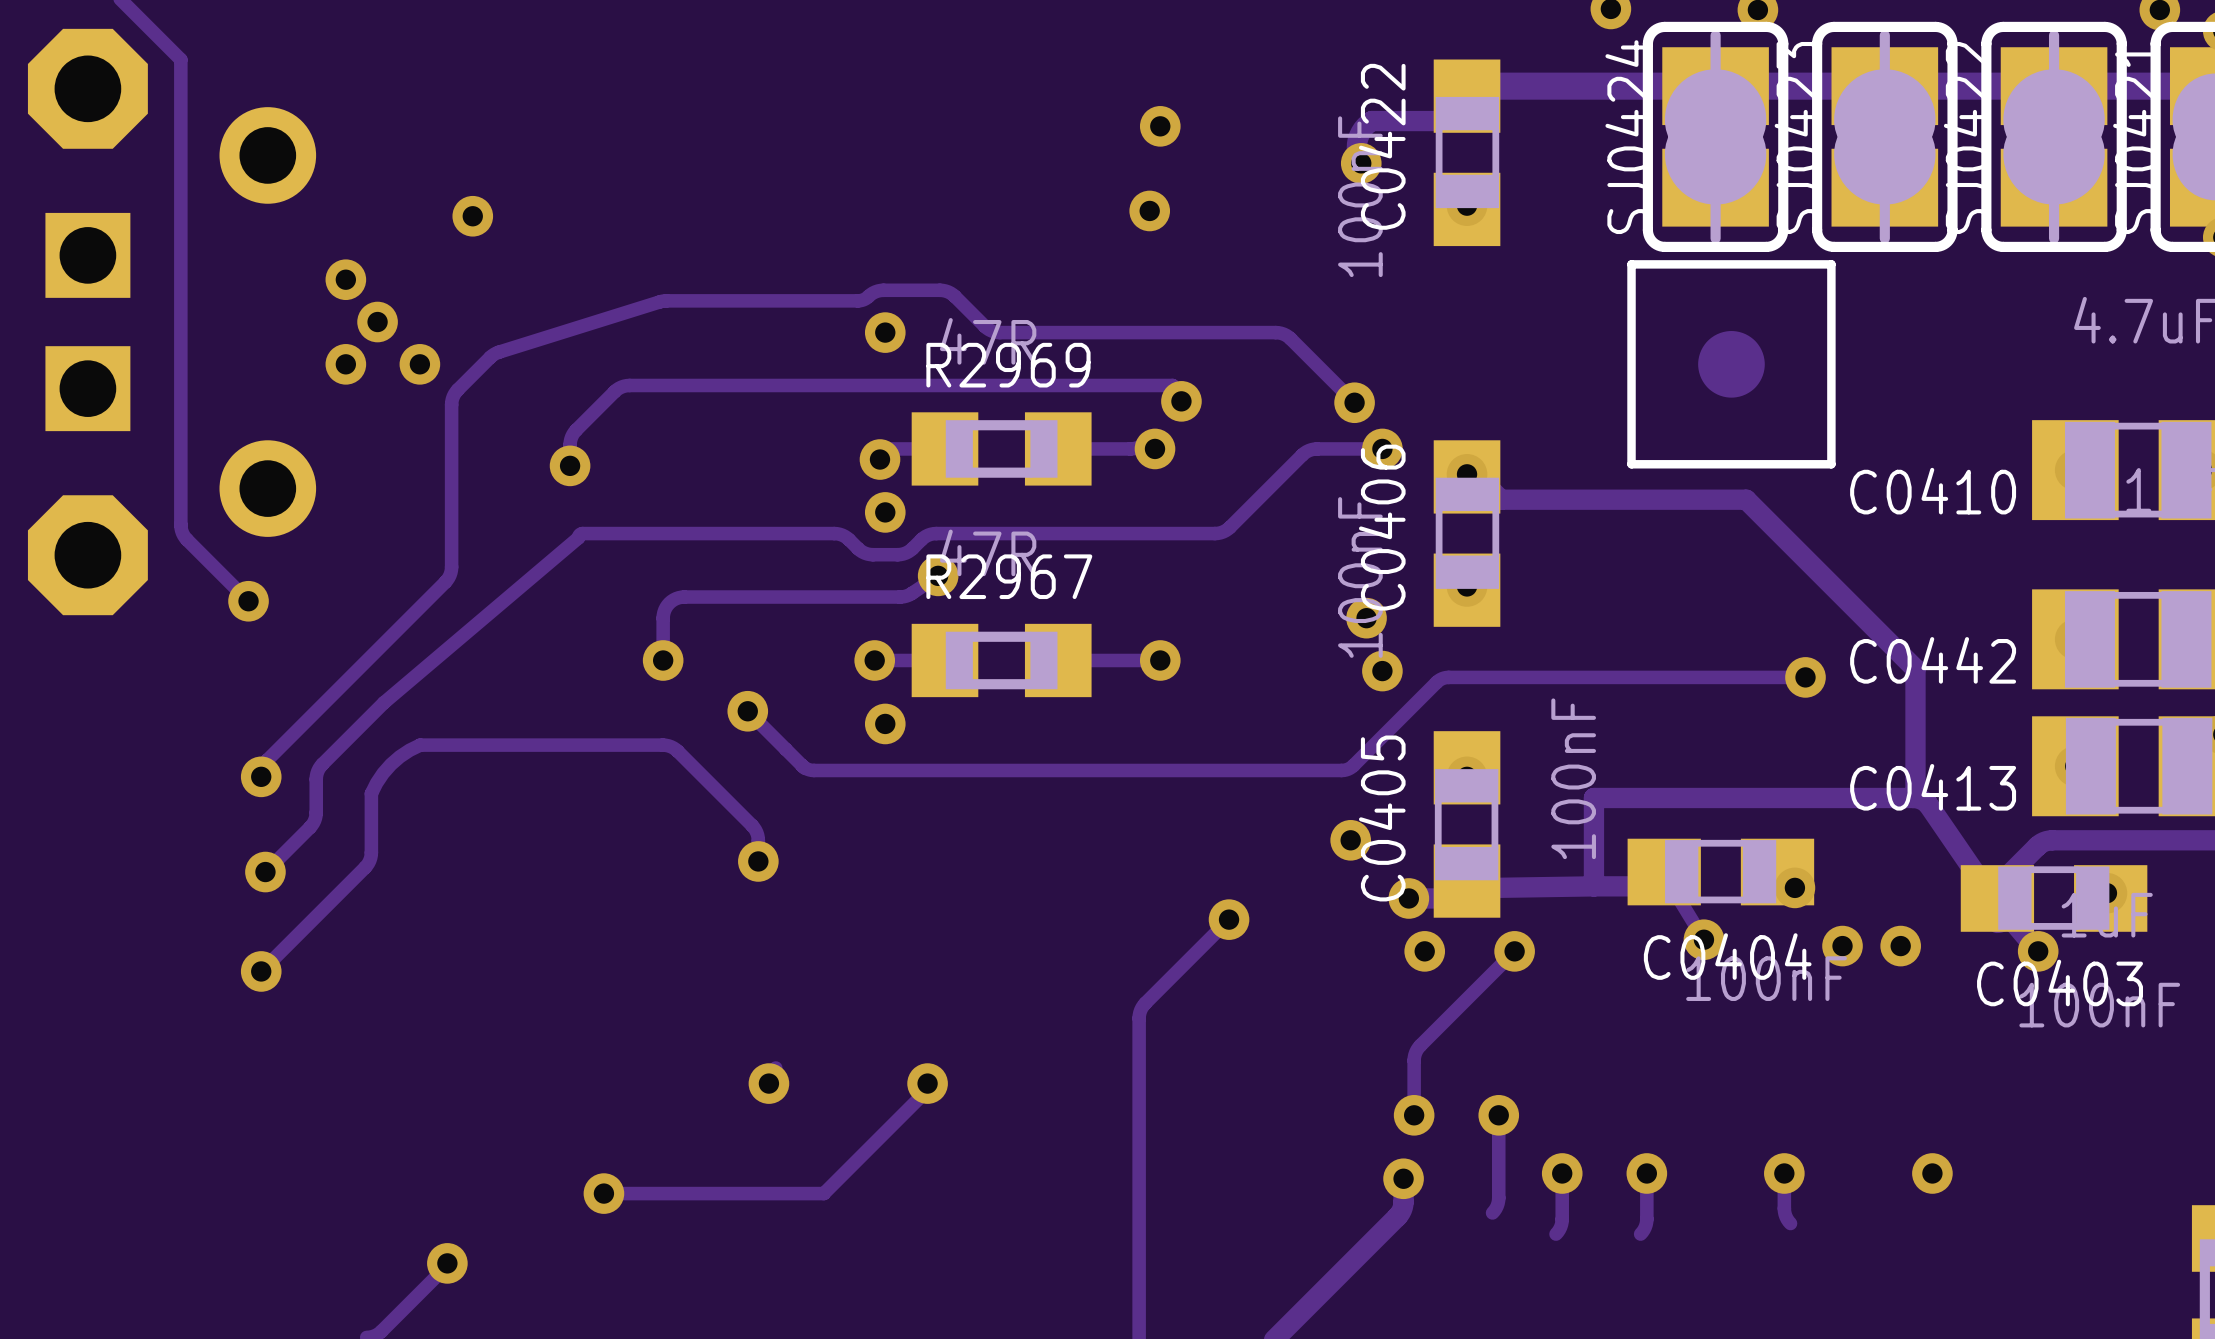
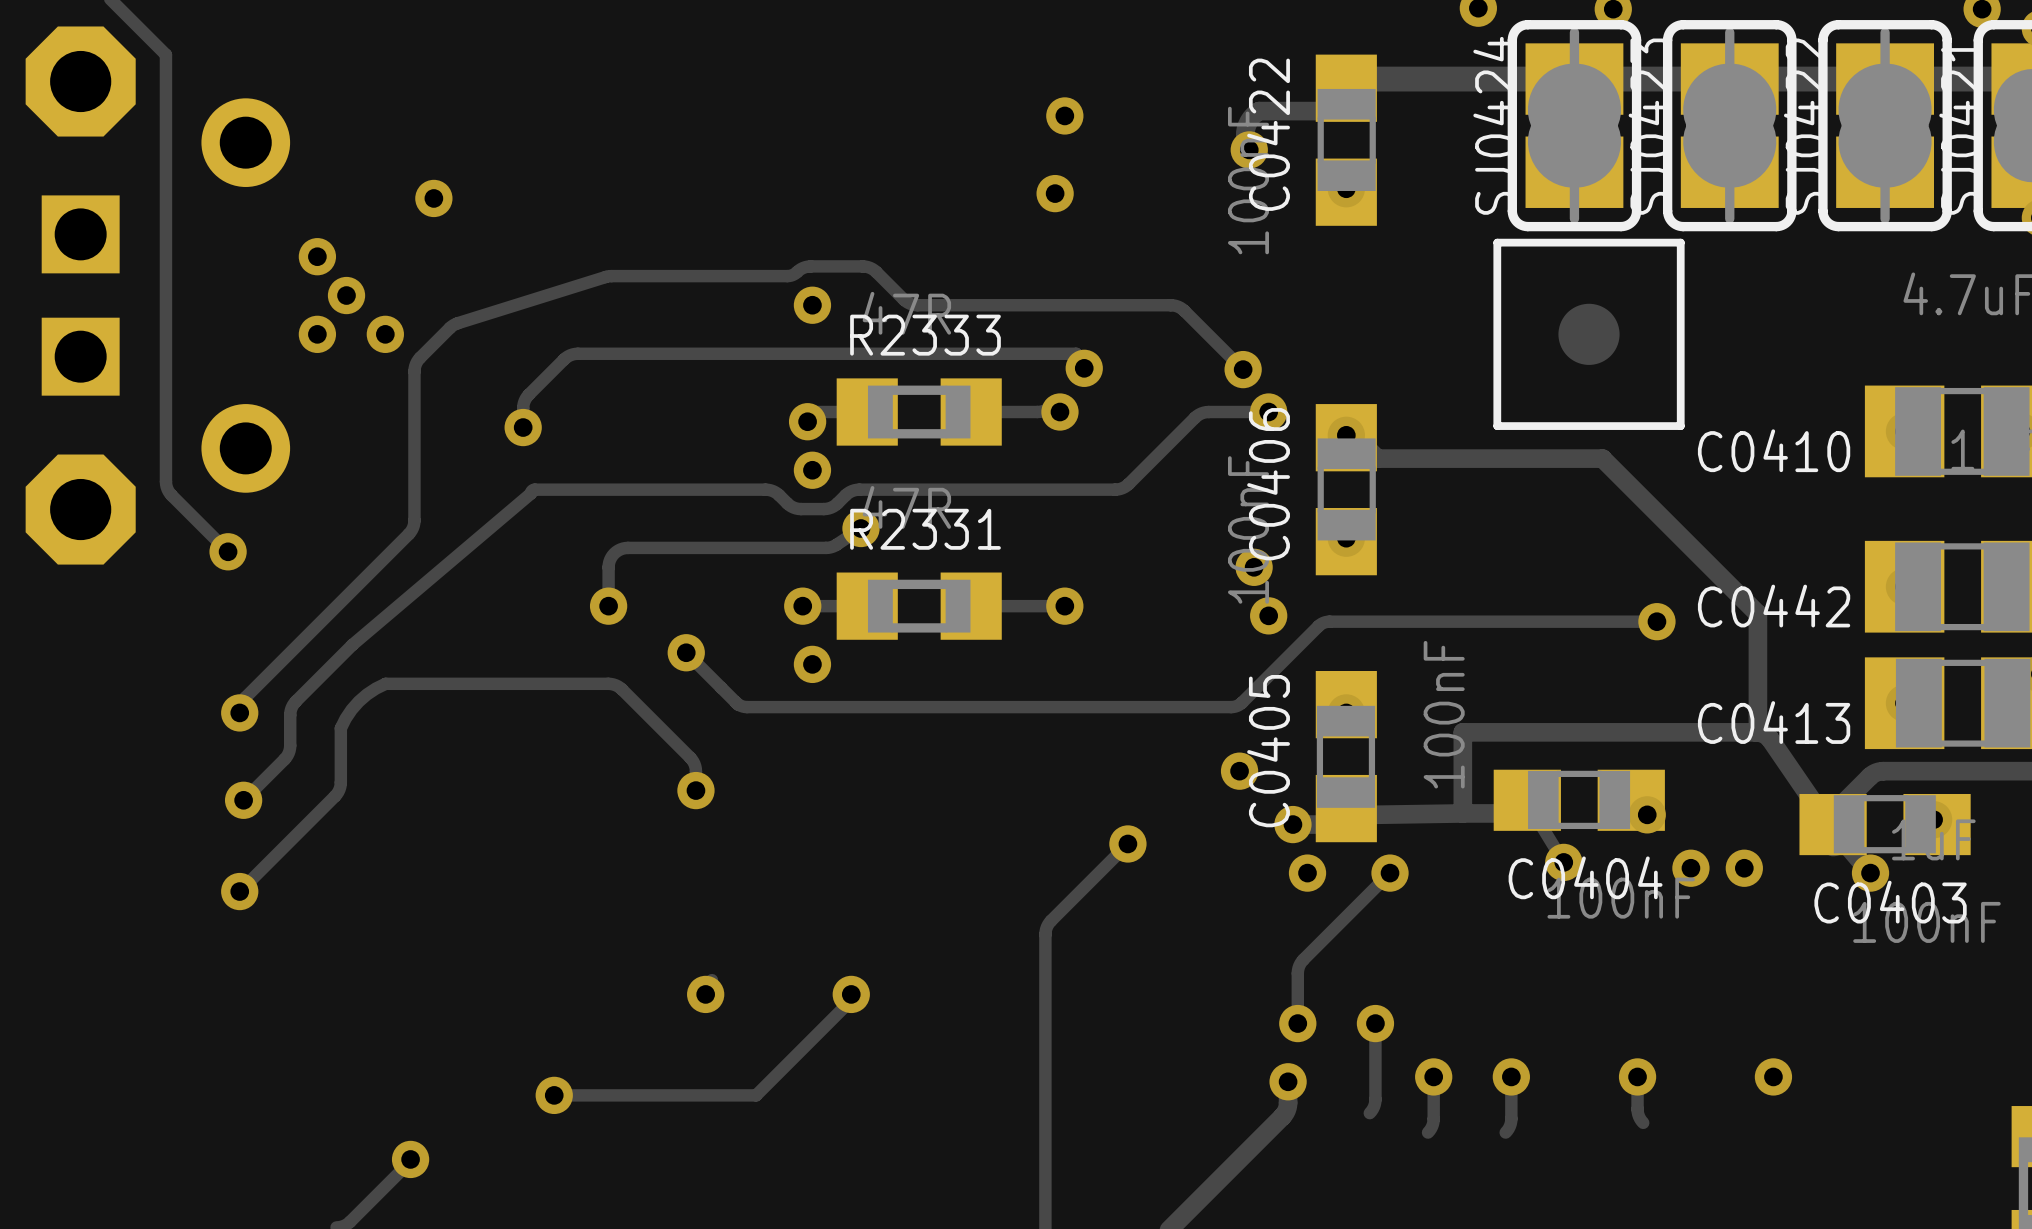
R2969 name: R2969 (1008, 365) -> R2333 (925, 335)
R2967 name: R2967 (1009, 576) -> R2331 (925, 529)

